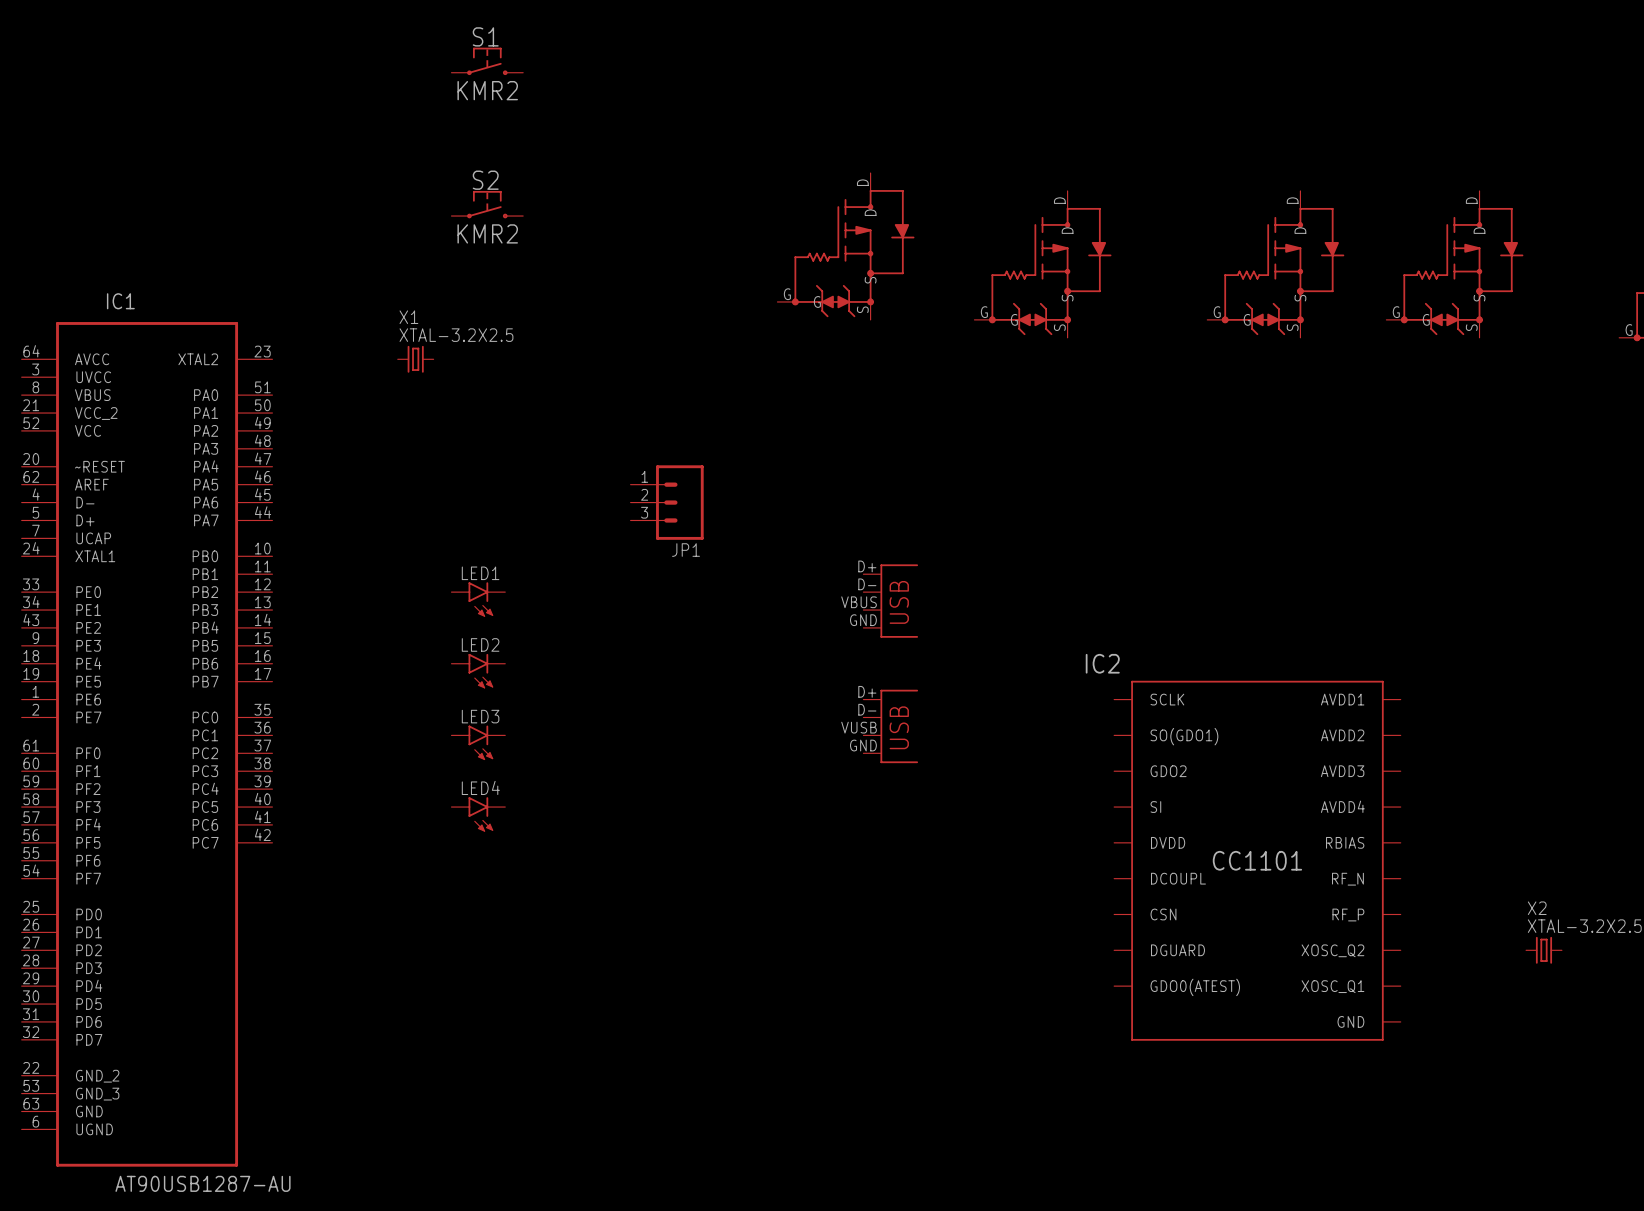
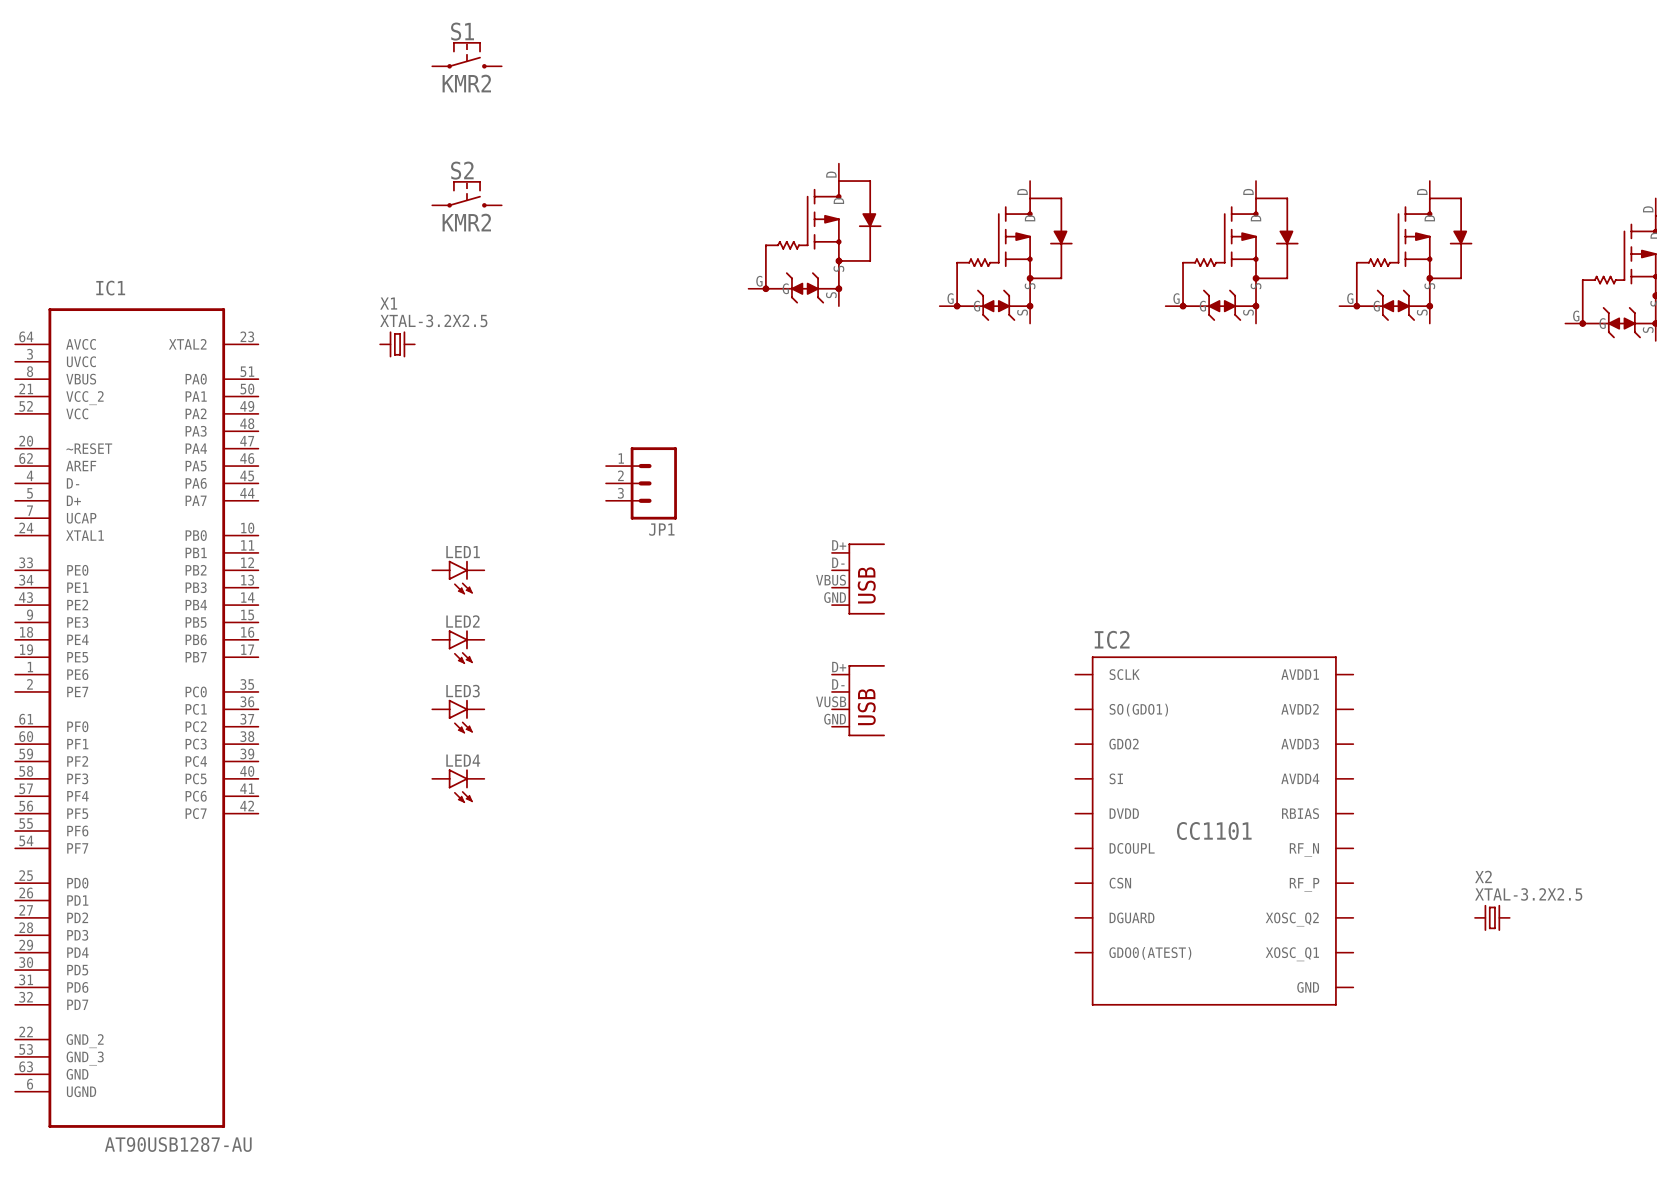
IC2 name position: IC2 (1102, 663) -> IC2 (1112, 639)

